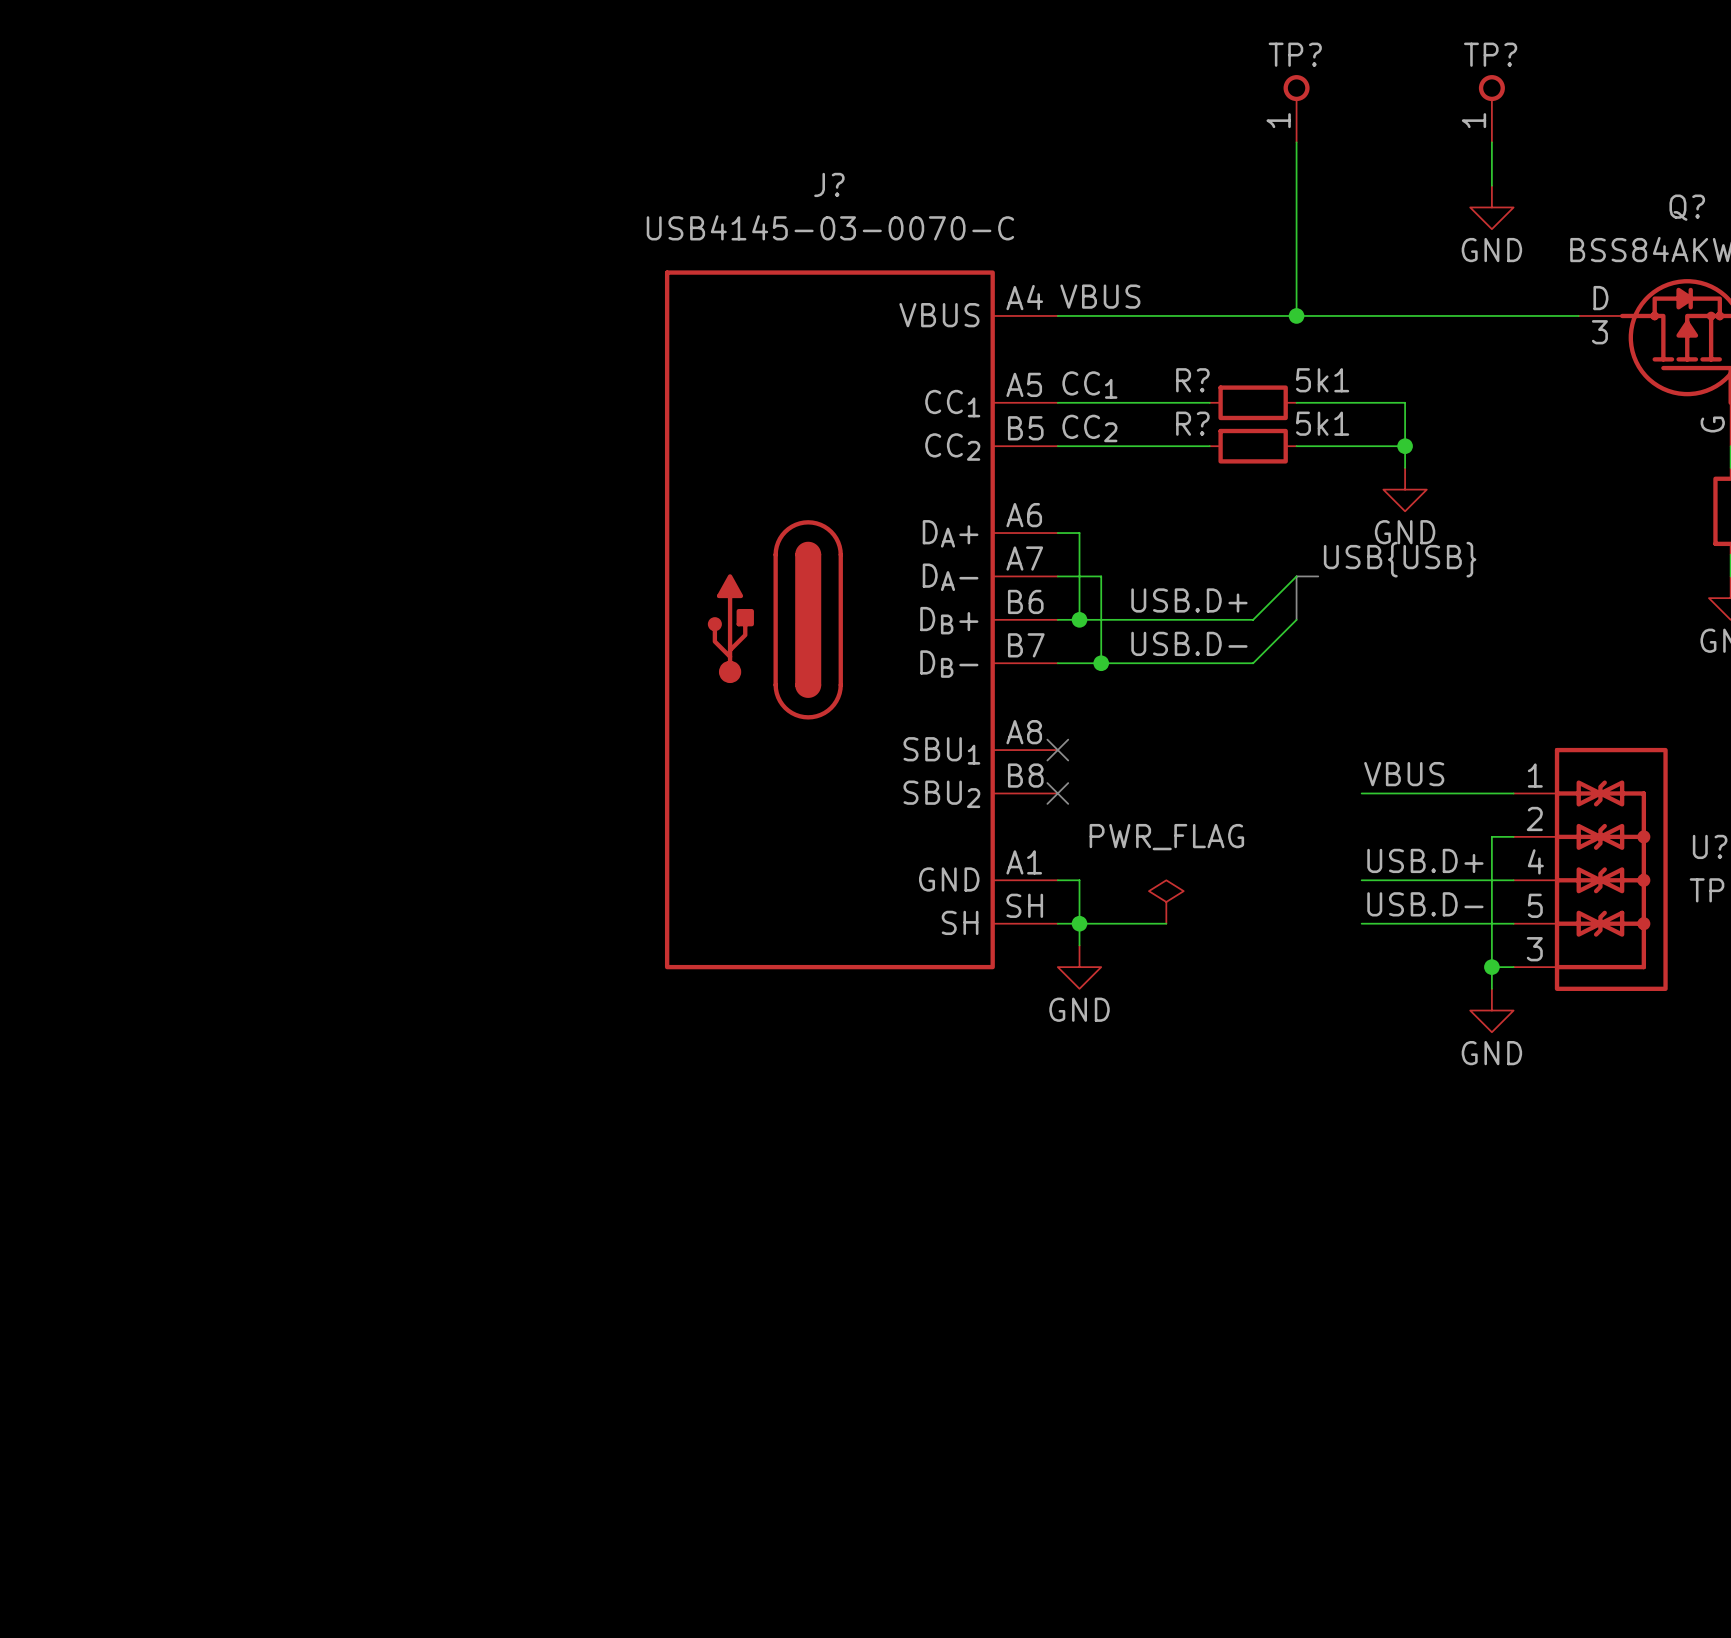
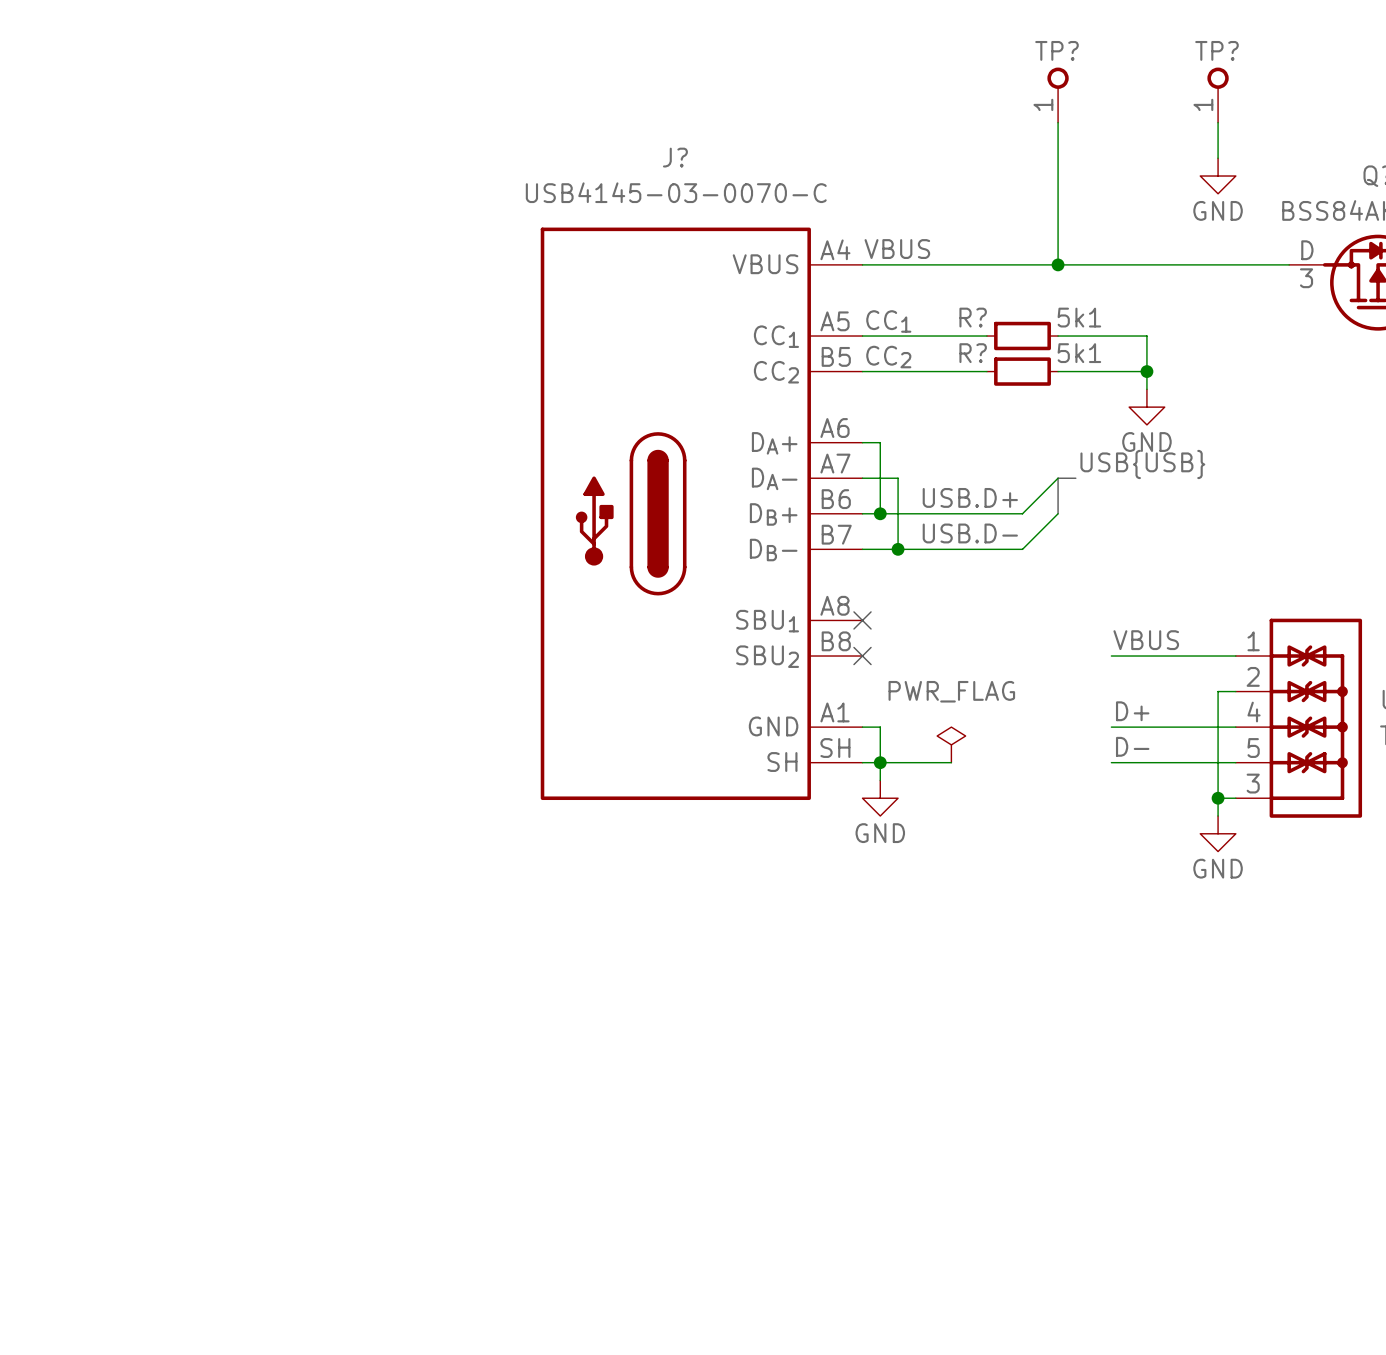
label: USB.D+ (1425, 860) -> D+ (1132, 711)
label: USB.D- (1425, 904) -> D- (1132, 746)

